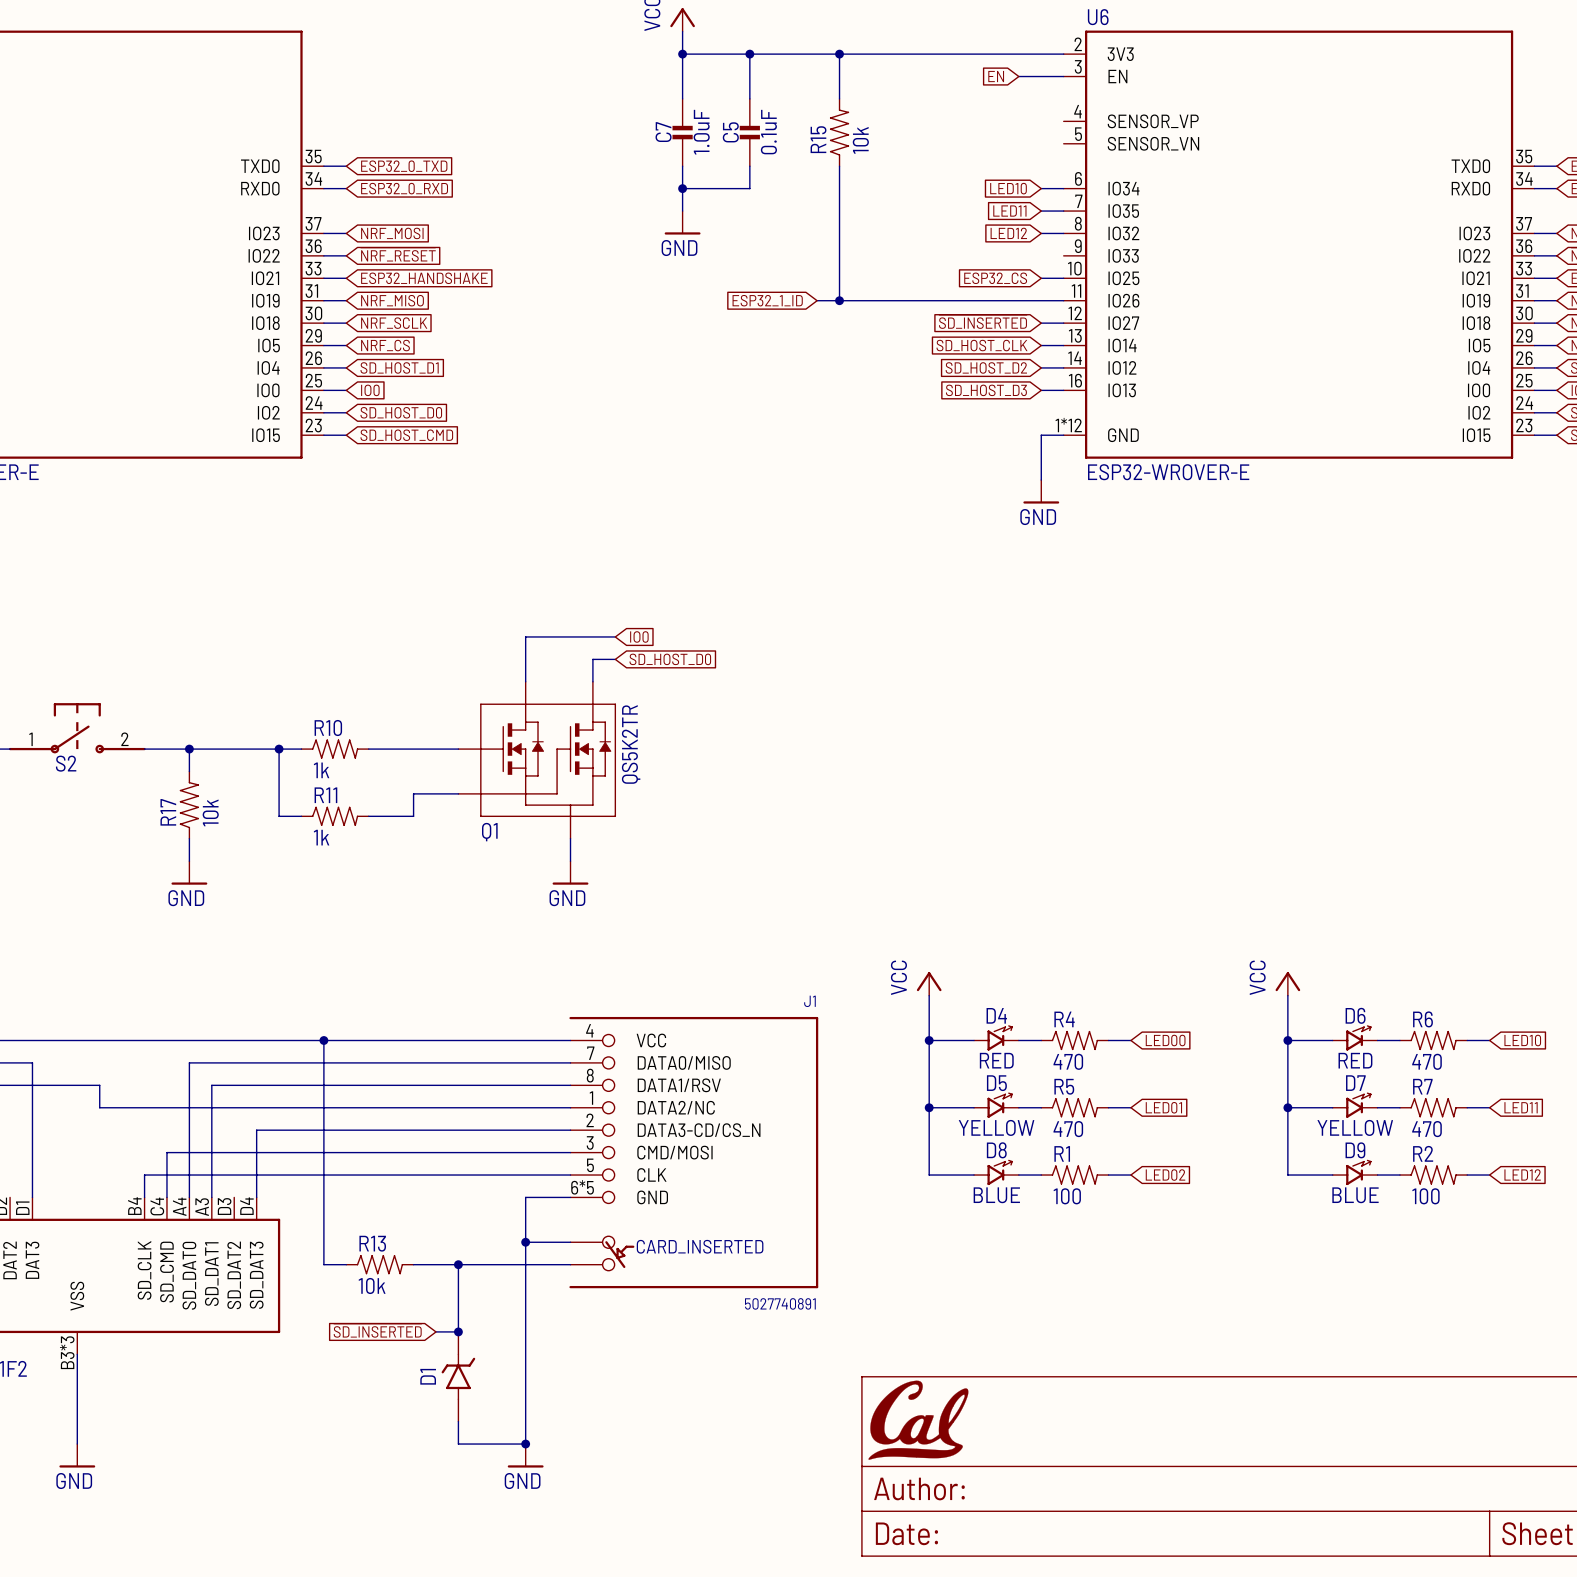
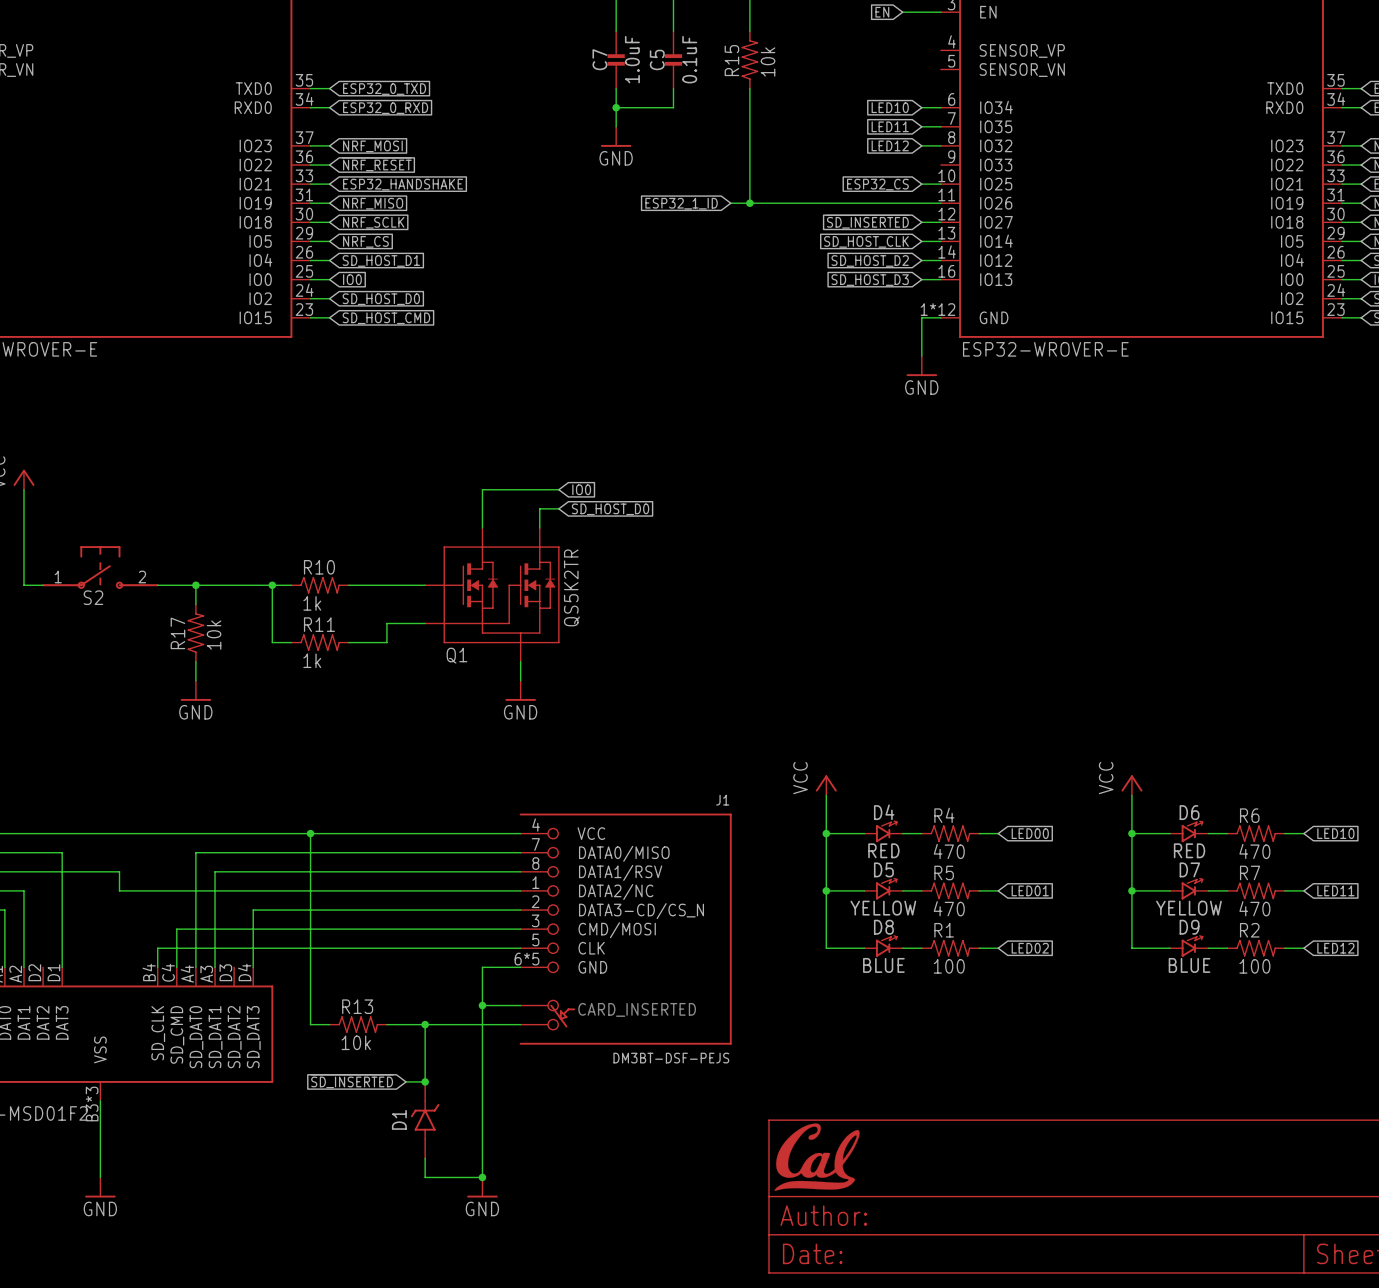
J1 value: 5027740891 (780, 1303) -> DM3BT-DSF-PEJS (671, 1058)

